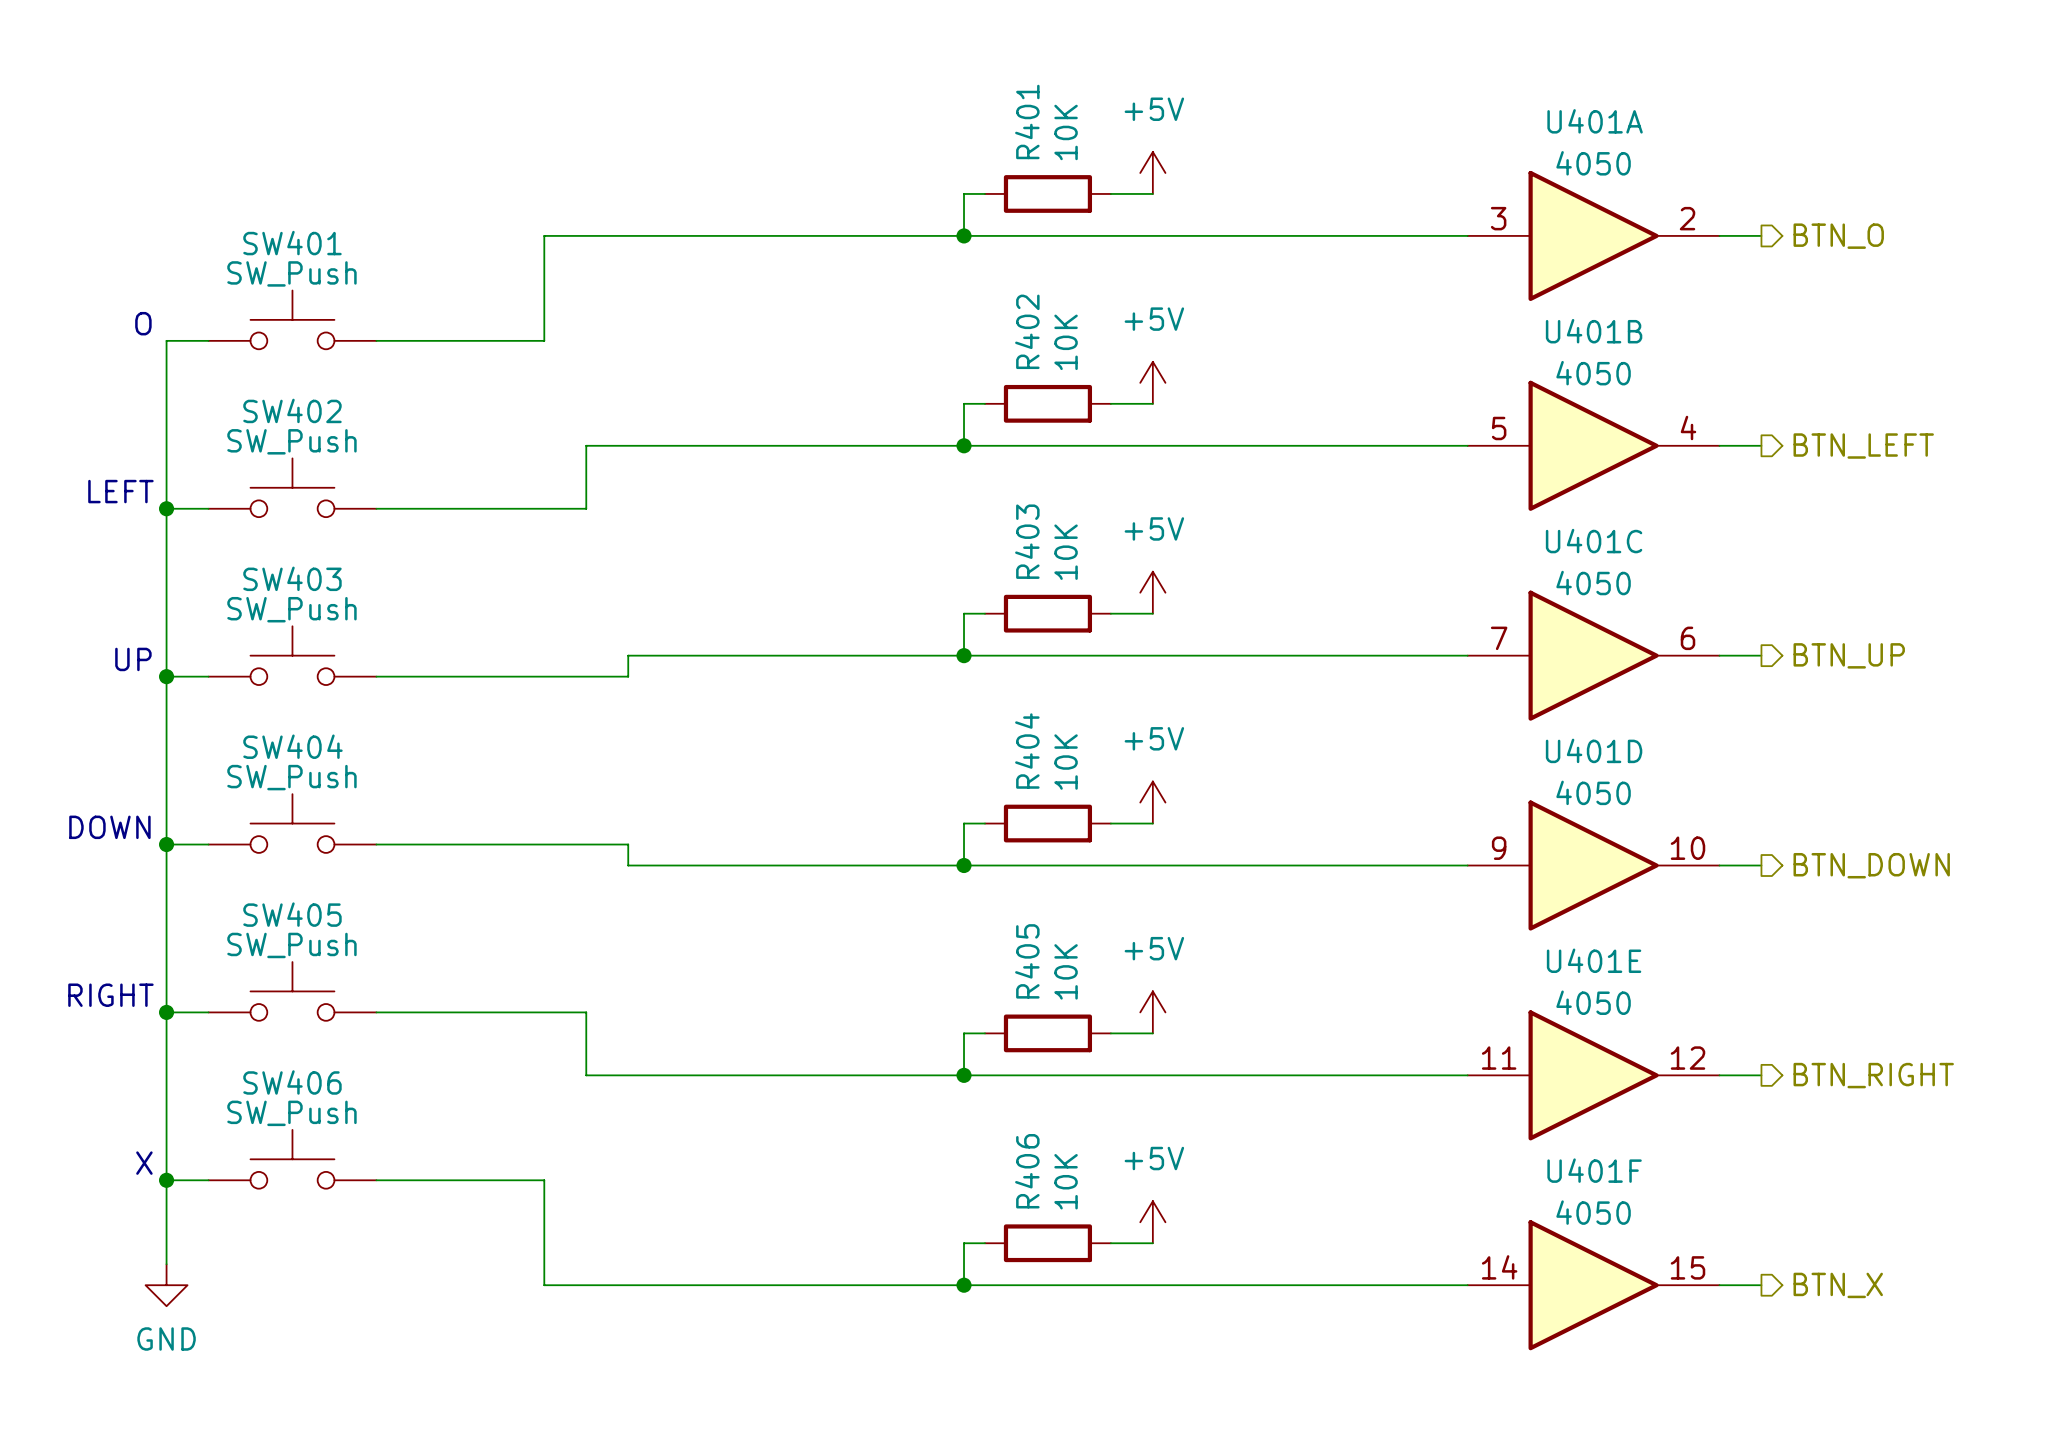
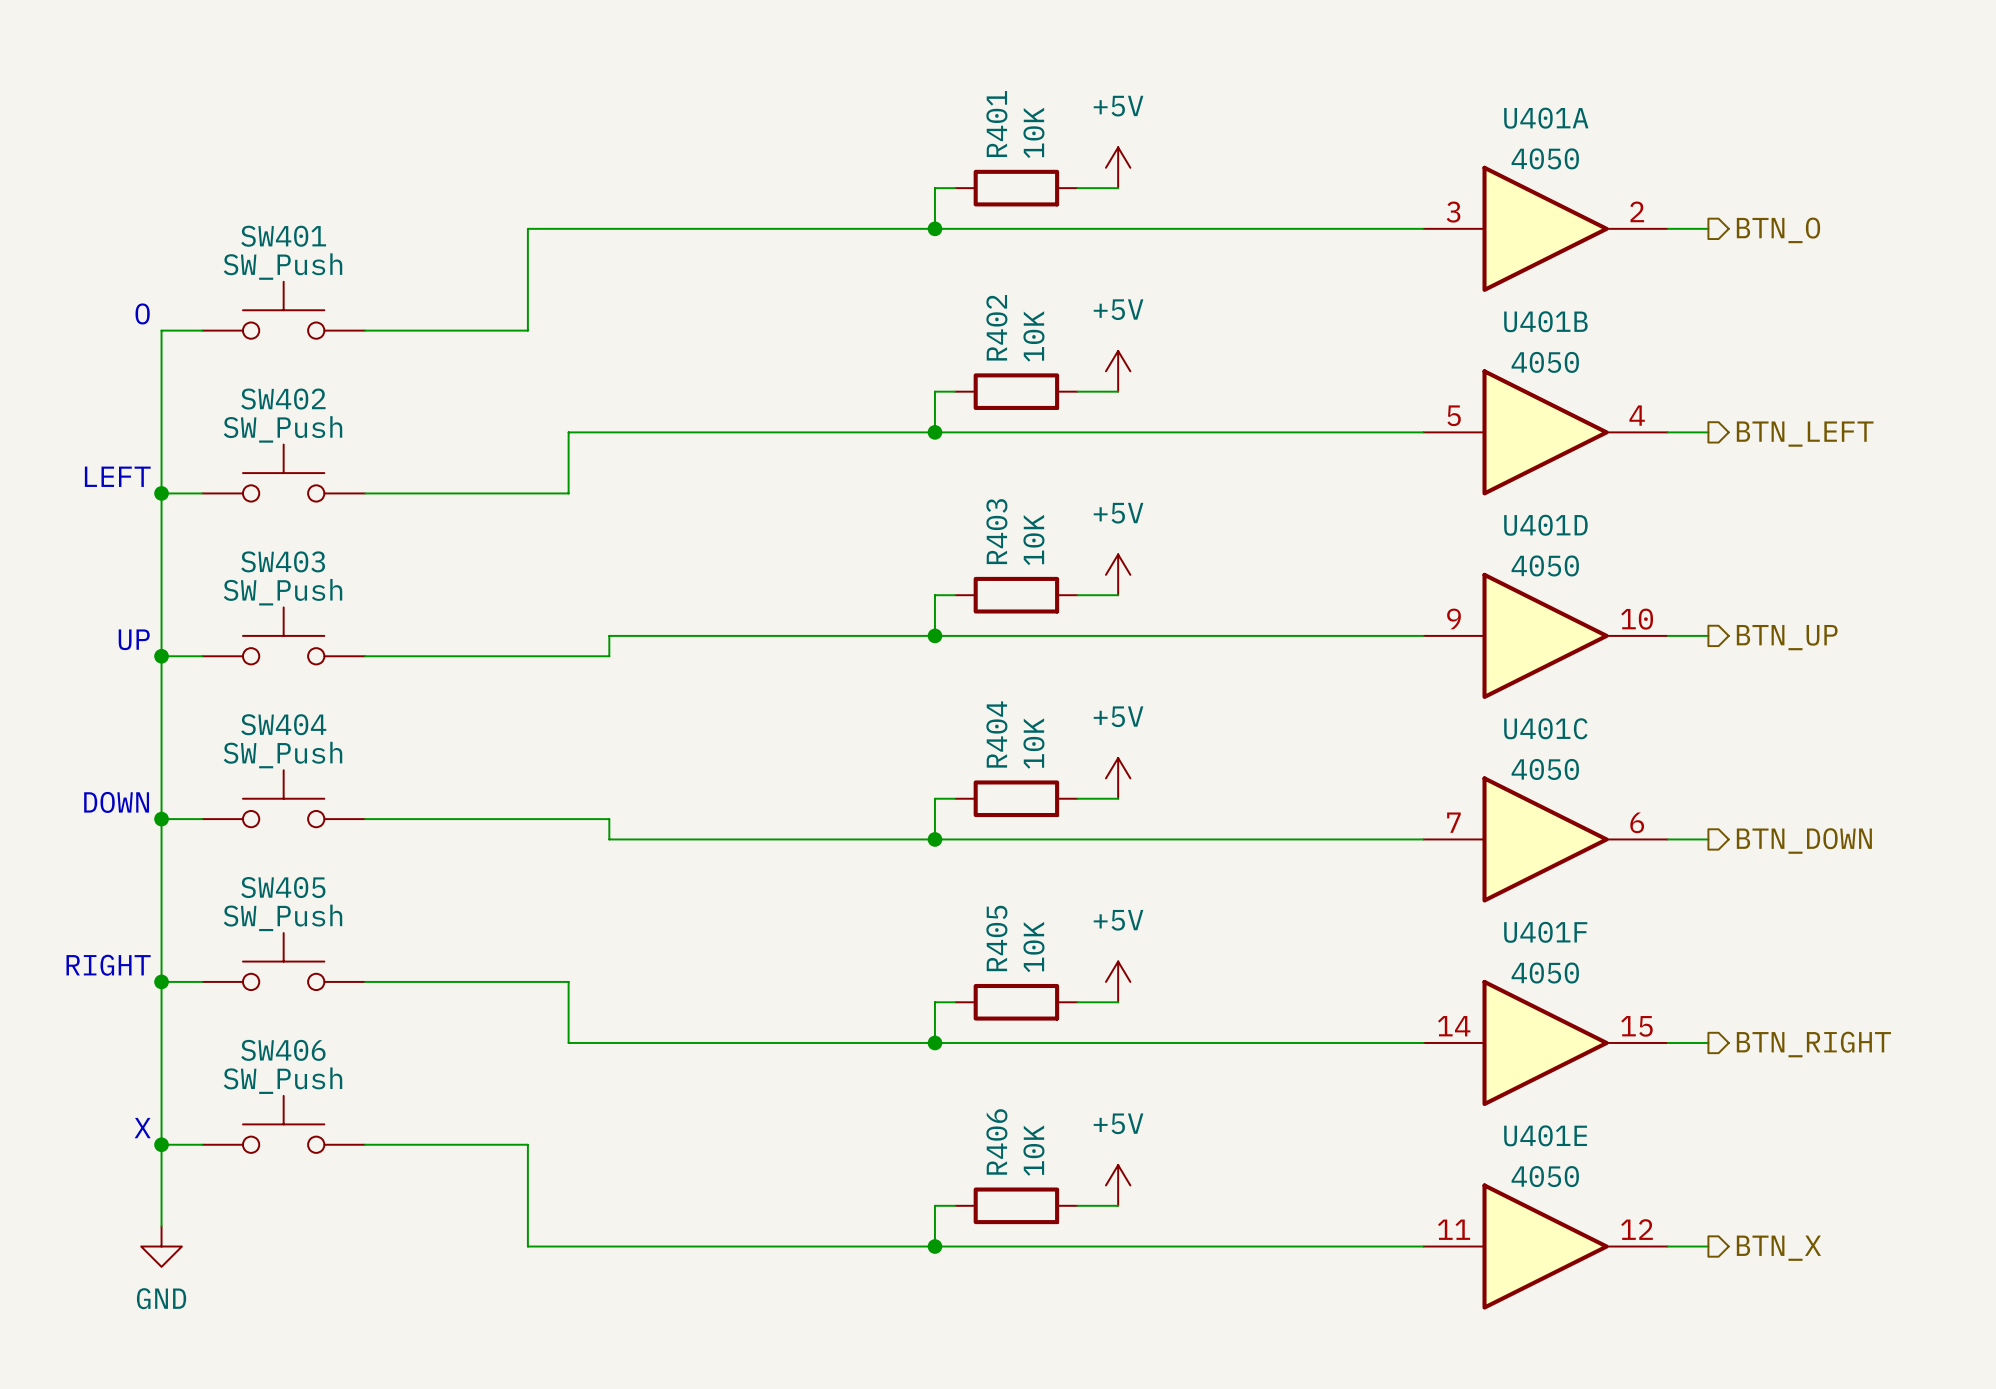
U401C position: (1593, 655) -> (1545, 839)
U401D position: (1593, 865) -> (1545, 635)
U401E position: (1593, 1075) -> (1545, 1246)
U401F position: (1593, 1285) -> (1545, 1042)

